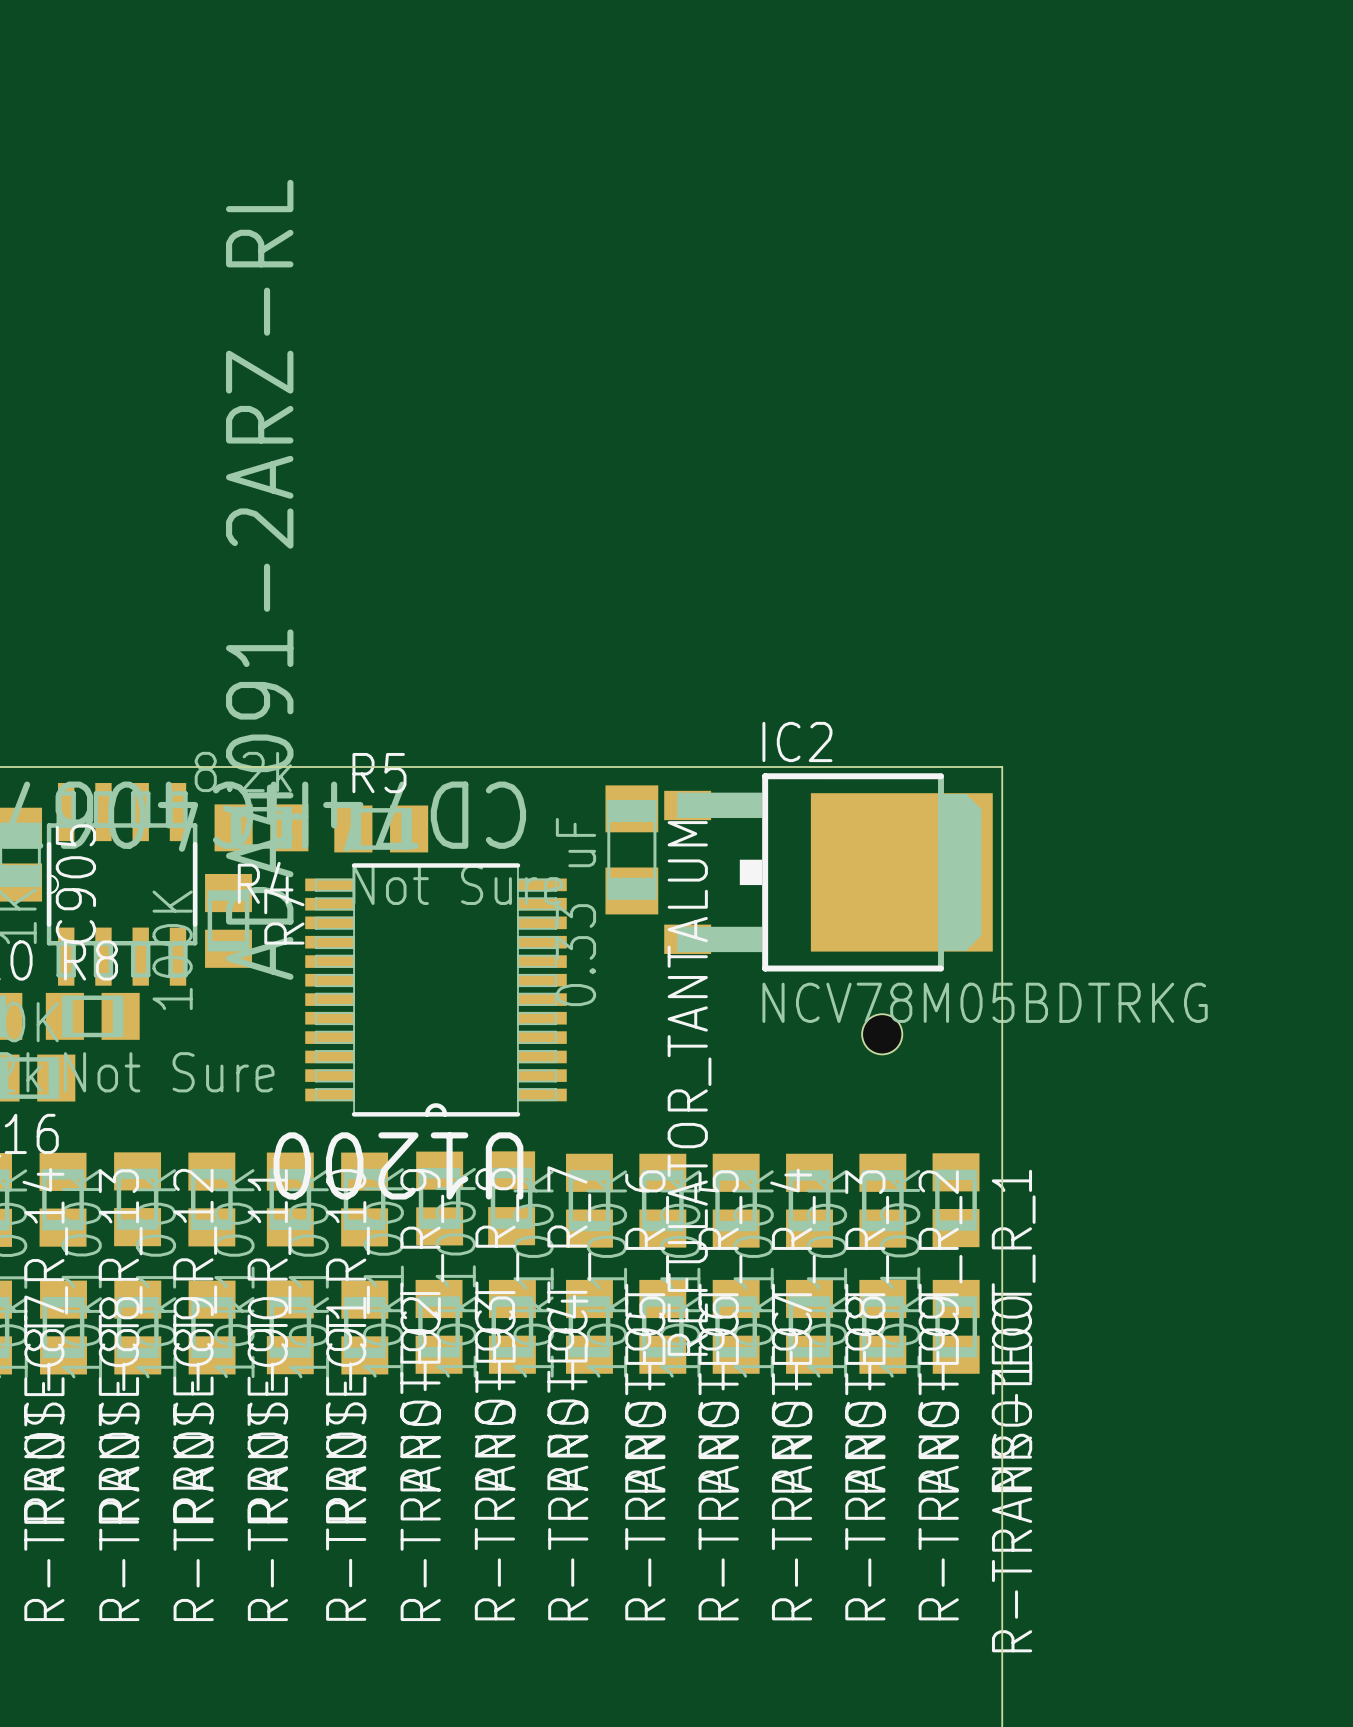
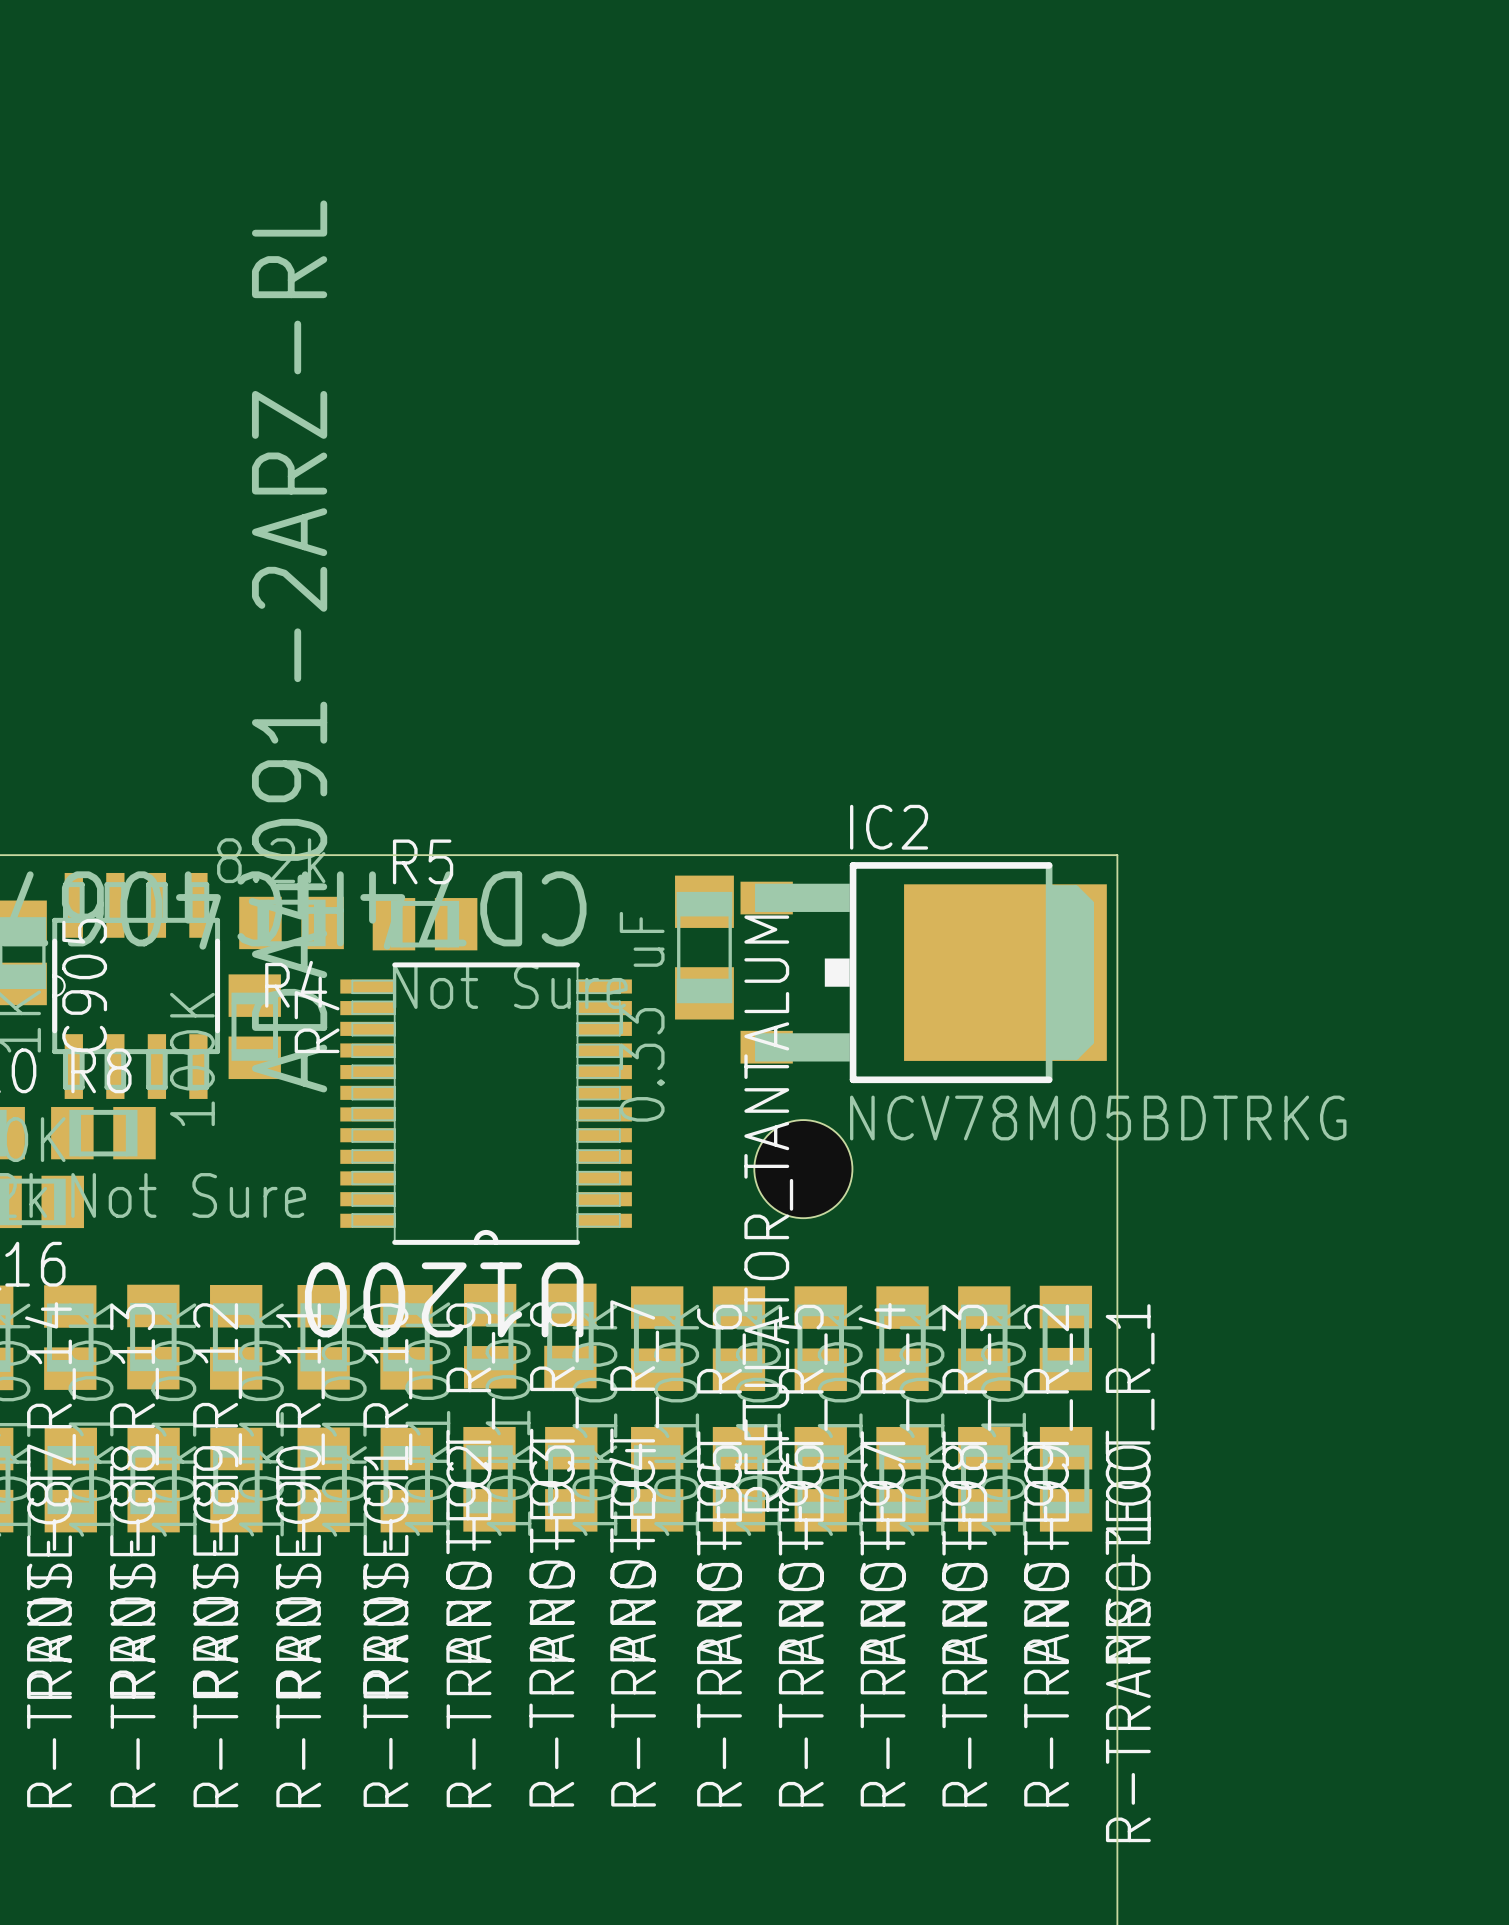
hole: (882, 1034) -> none
hole: none -> (803, 1169)

